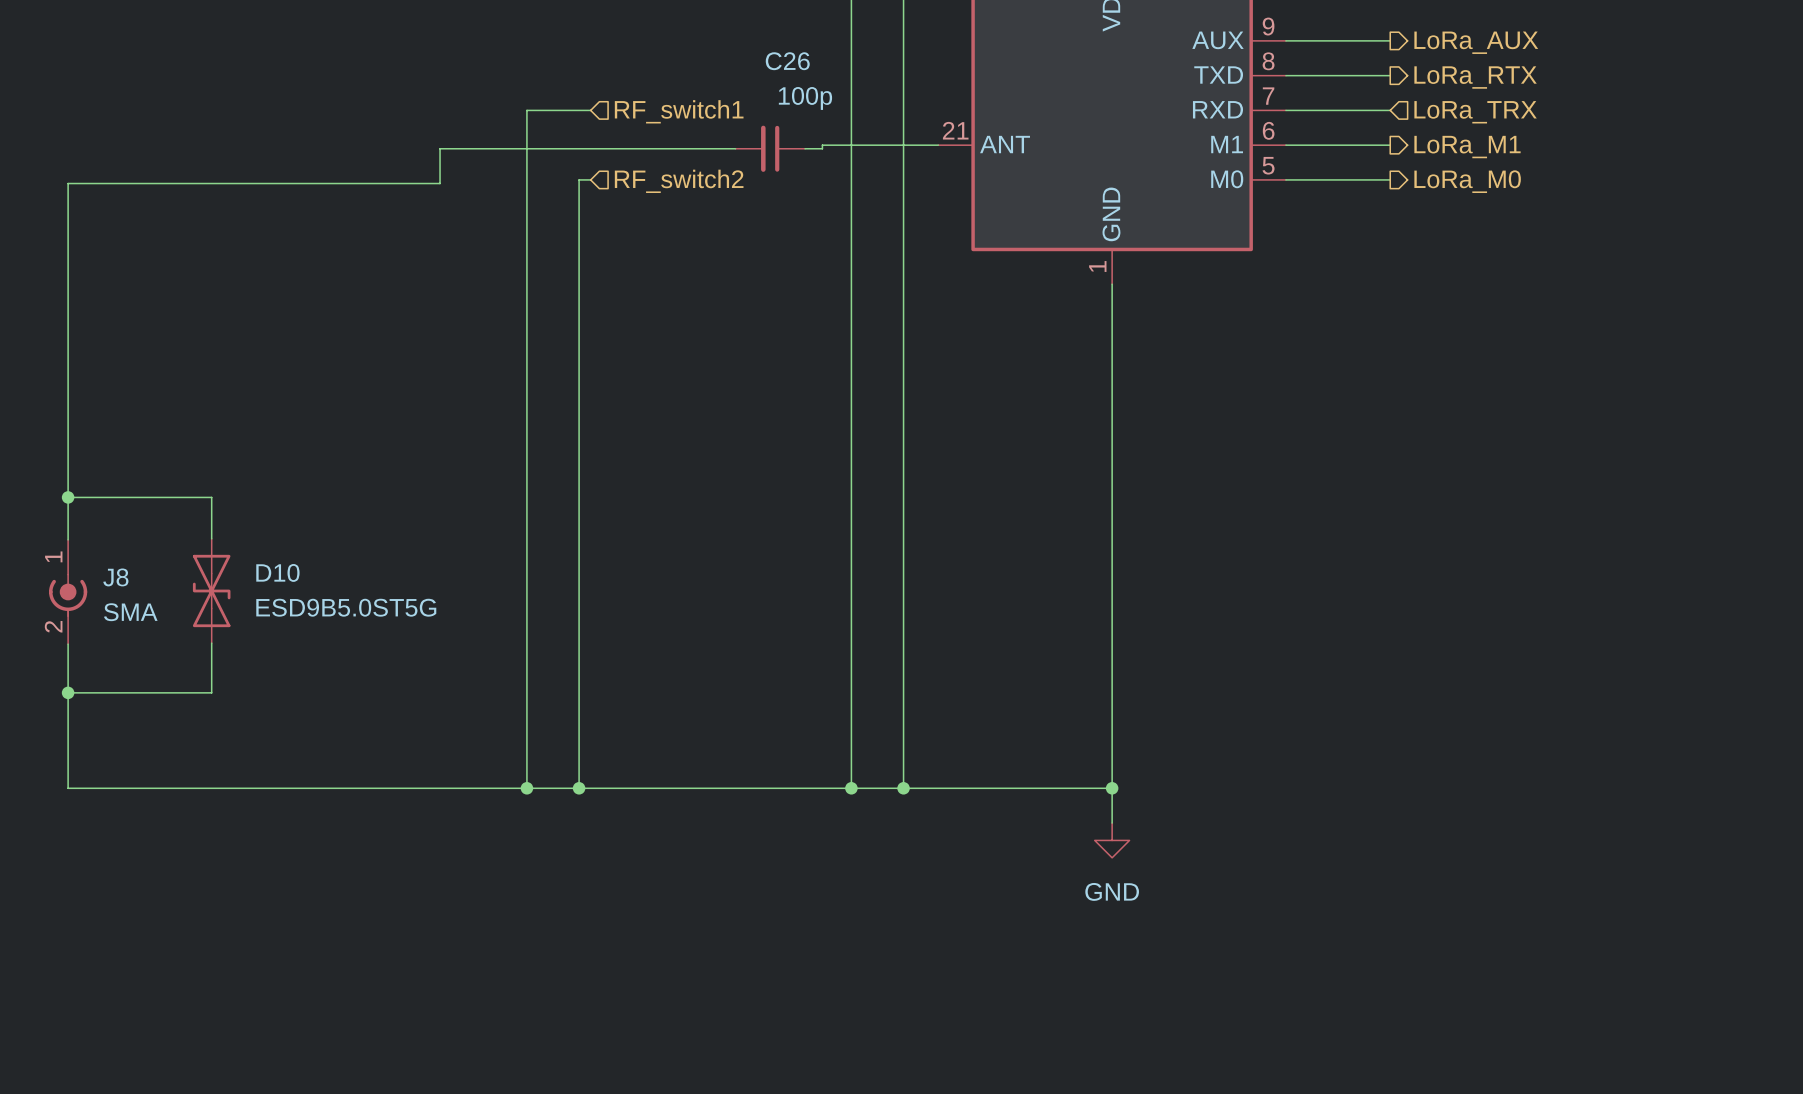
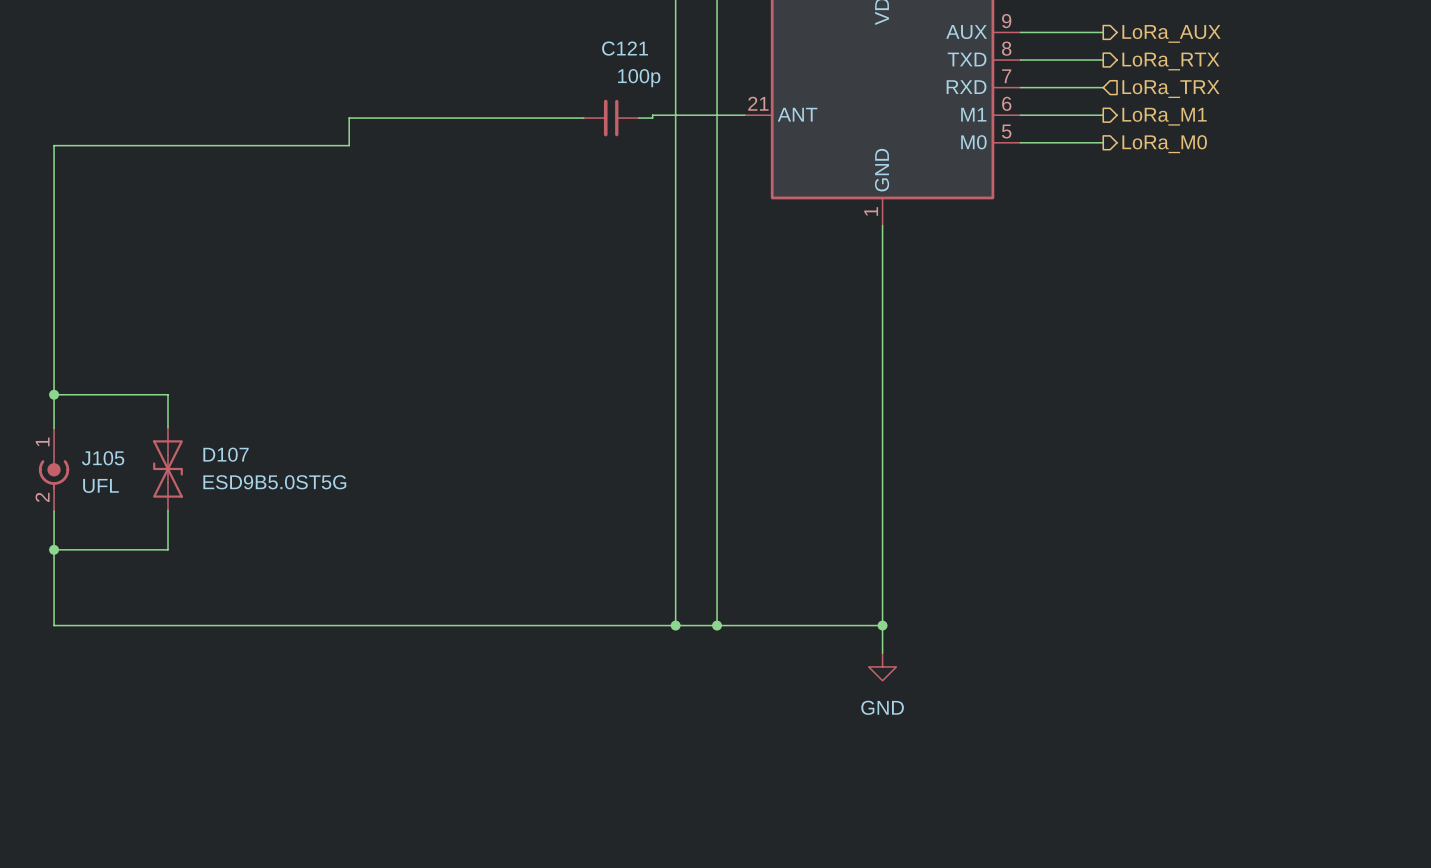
C26 name: C26 (787, 61) -> C121 (625, 48)
wire: (590, 110) (526, 110) (526, 788) -> none
hierarchical label: RF_switch1 (679, 111) -> none
wire: (590, 179) (579, 179) (579, 788) -> none
hierarchical label: RF_switch2 (679, 181) -> none
D10 name: D10 (277, 572) -> D107 (226, 454)
J8 name: J8 (115, 577) -> J105 (103, 458)
J8 value: SMA (130, 612) -> UFL (101, 485)
junction: (526, 788) -> none
junction: (579, 788) -> none

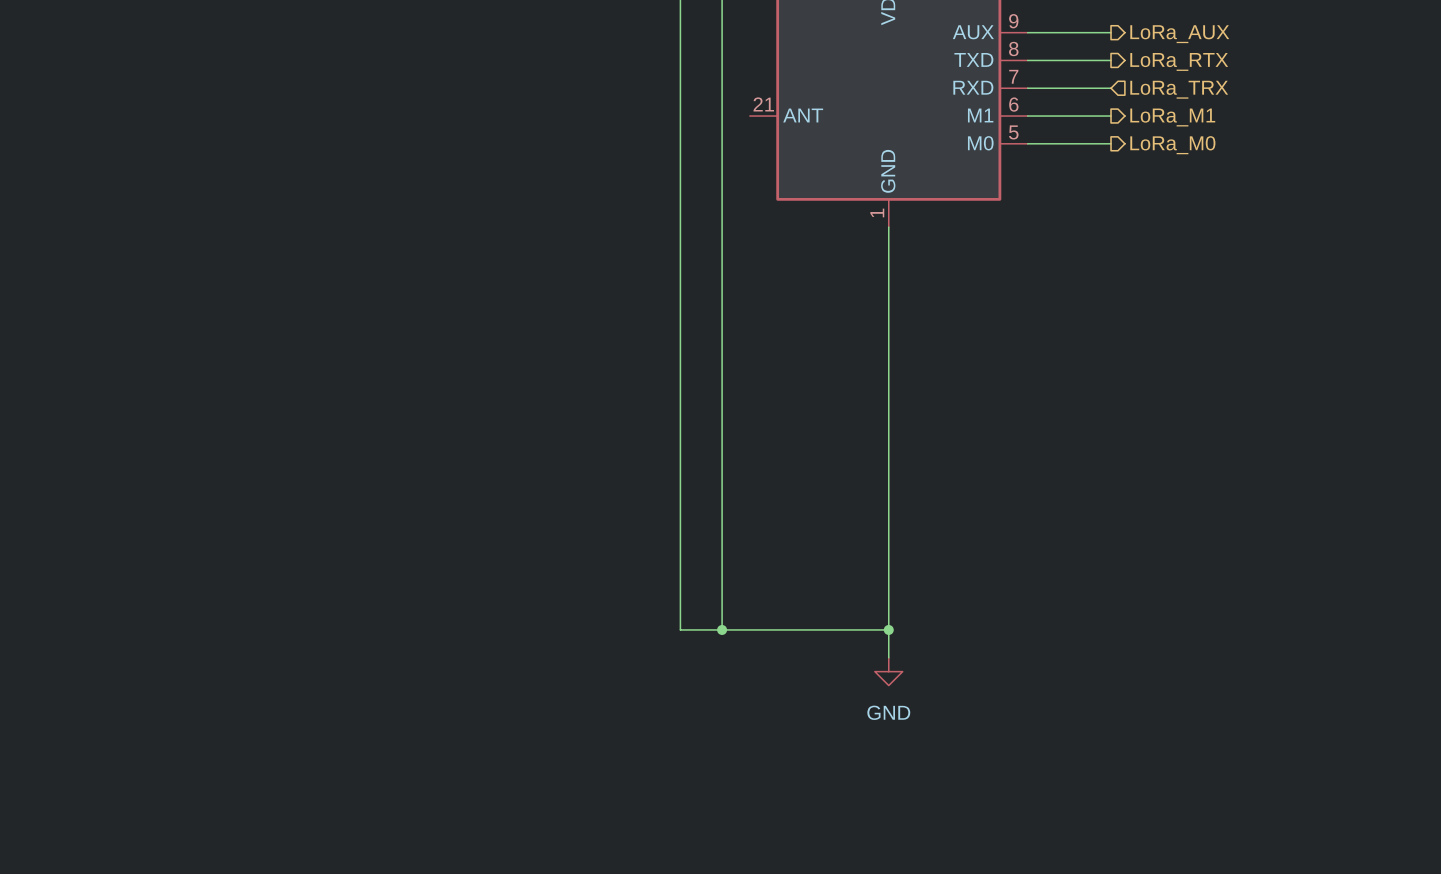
wire: (744, 115) (652, 115) (652, 118) (638, 118) -> none
wire: (583, 118) (349, 118) (349, 145) (54, 145) (54, 428) -> none
C121: 100p (611, 118) -> none
wire: (54, 394) (167, 394) (167, 427) -> none
junction: (54, 394) -> none
D107: ESD9B5.0ST5G (167, 468) -> none
J105: UFL (54, 469) -> none
wire: (167, 510) (167, 549) (54, 549) -> none
wire: (54, 511) (54, 625) (675, 625) -> none
junction: (54, 549) -> none
junction: (675, 625) -> none

